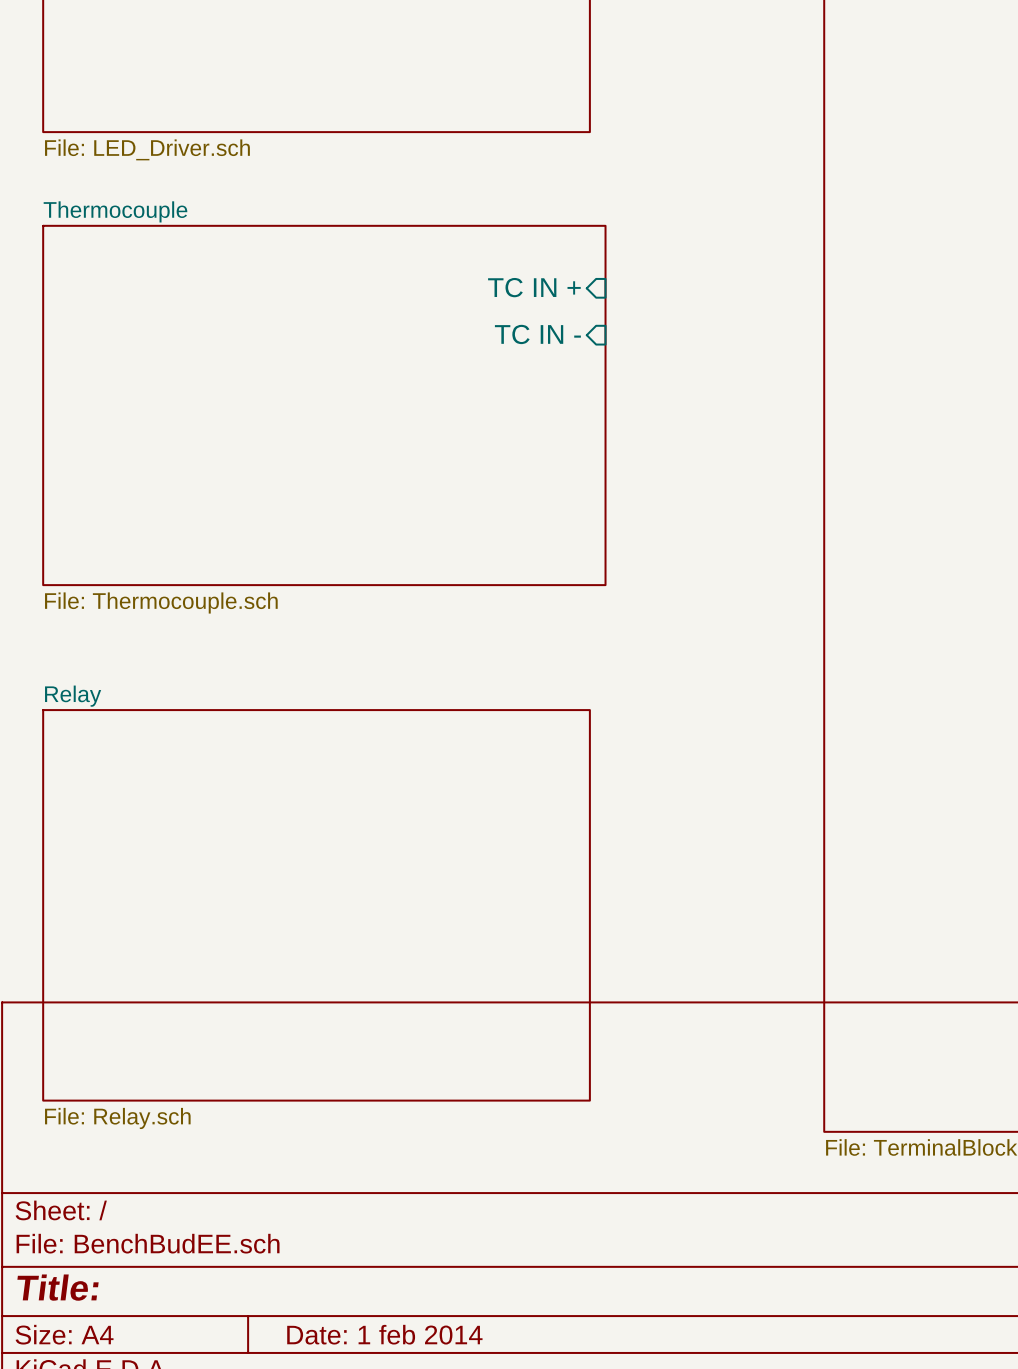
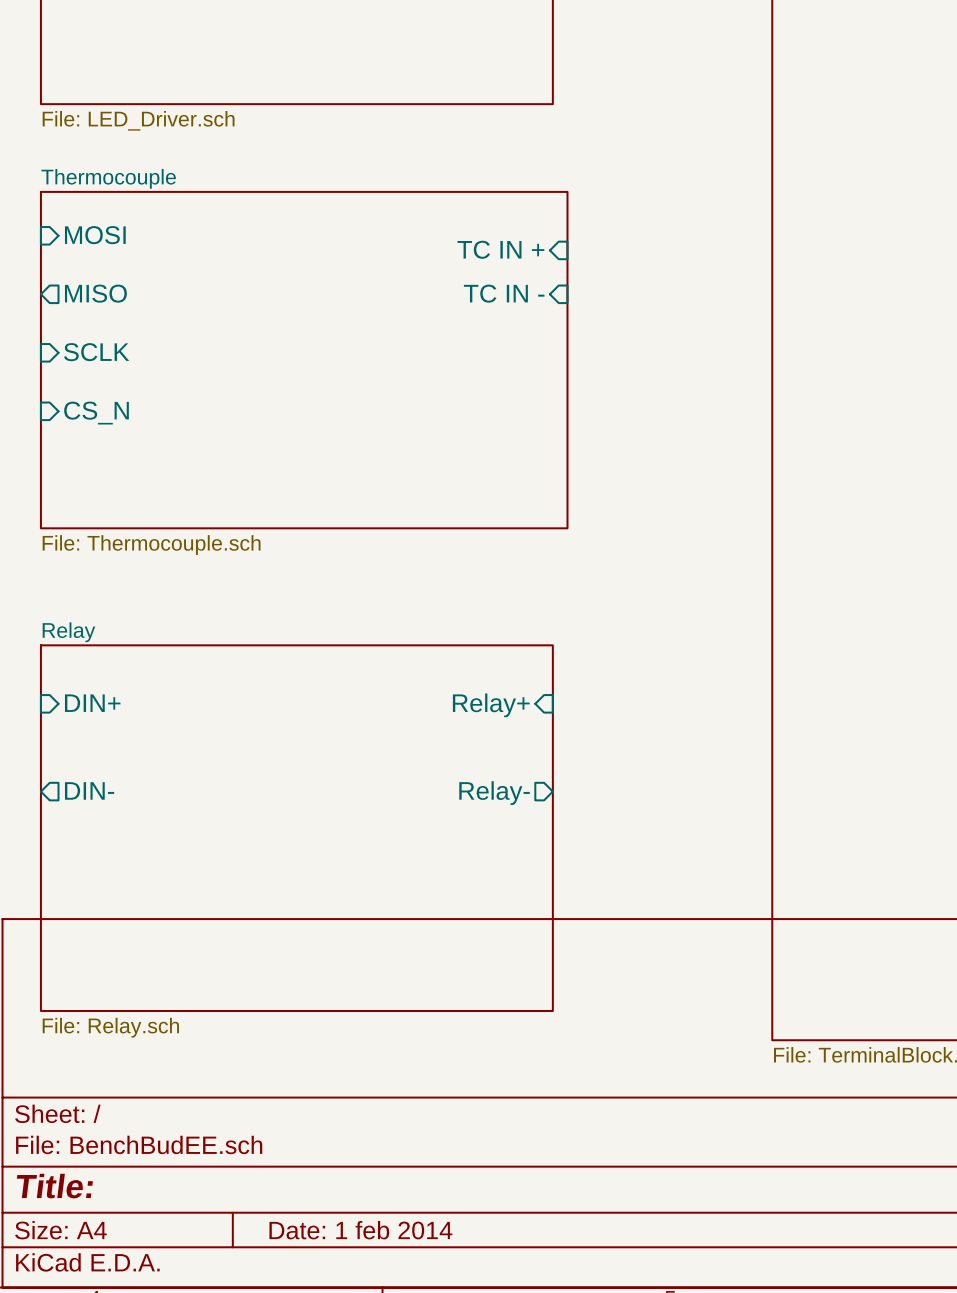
sheet pin: none -> MOSI (95, 235)
sheet pin: none -> MISO (95, 293)
sheet pin: none -> SCLK (96, 352)
sheet pin: none -> CS_N (96, 413)
sheet pin: none -> DIN+ (92, 703)
sheet pin: none -> Relay+ (491, 705)
sheet pin: none -> DIN- (89, 790)
sheet pin: none -> Relay- (494, 793)

